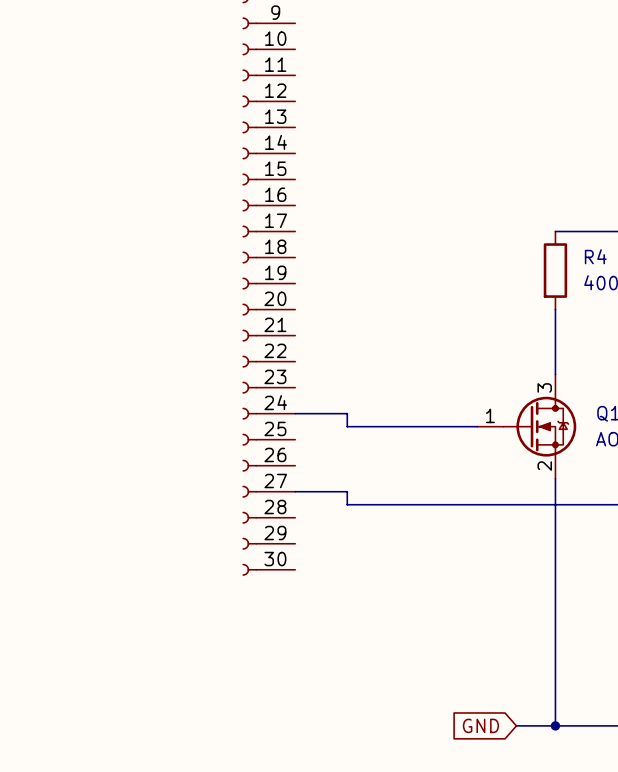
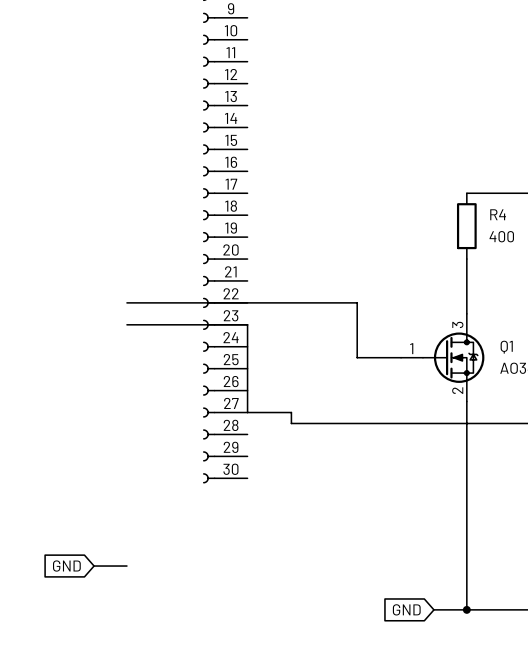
wire: none -> (126, 324) (247, 324) (247, 412)
wire: (295, 413) (347, 413) (347, 426) (425, 426) -> (126, 302) (357, 302) (357, 357)
global label: none -> GND (66, 566)
wire: none -> (94, 566) (126, 566)

